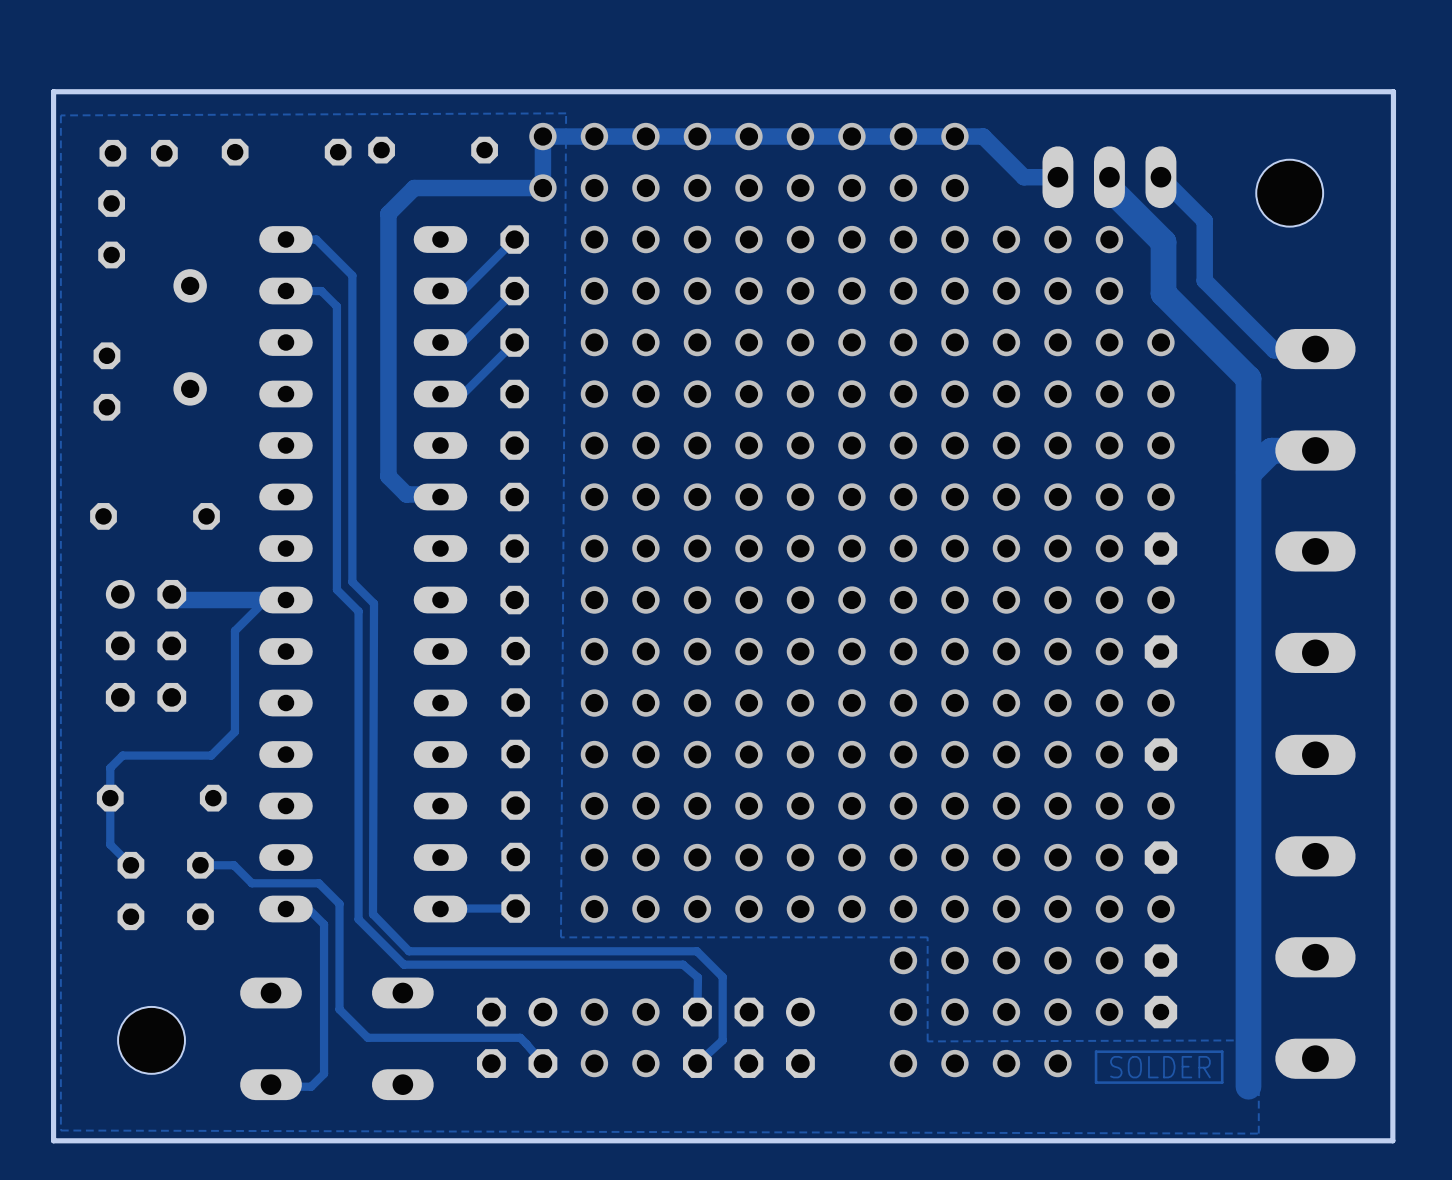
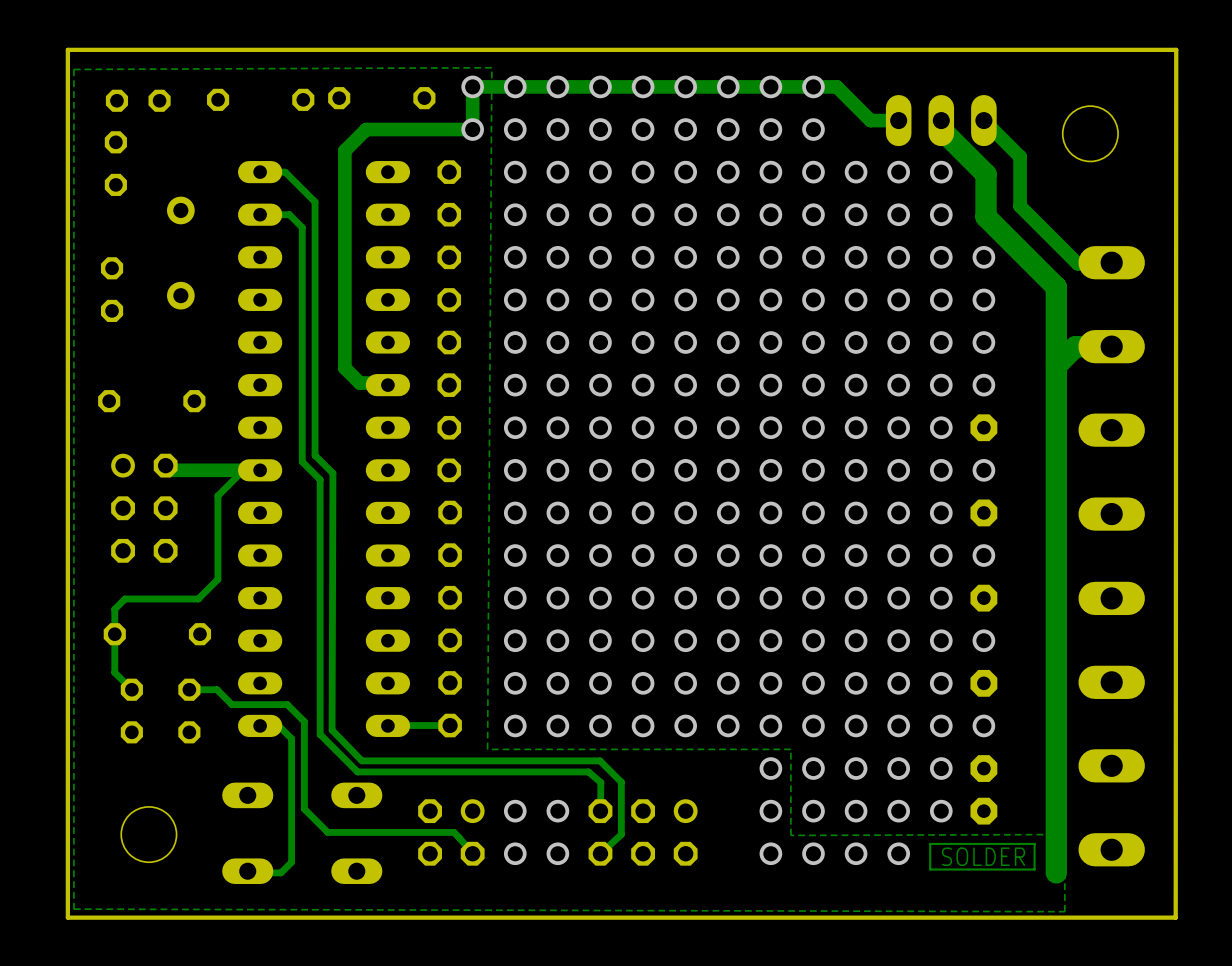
track: (514, 239) (463, 291) (440, 291) -> none
track: (514, 291) (463, 342) (440, 342) -> none
track: (514, 342) (463, 394) (440, 394) -> none

